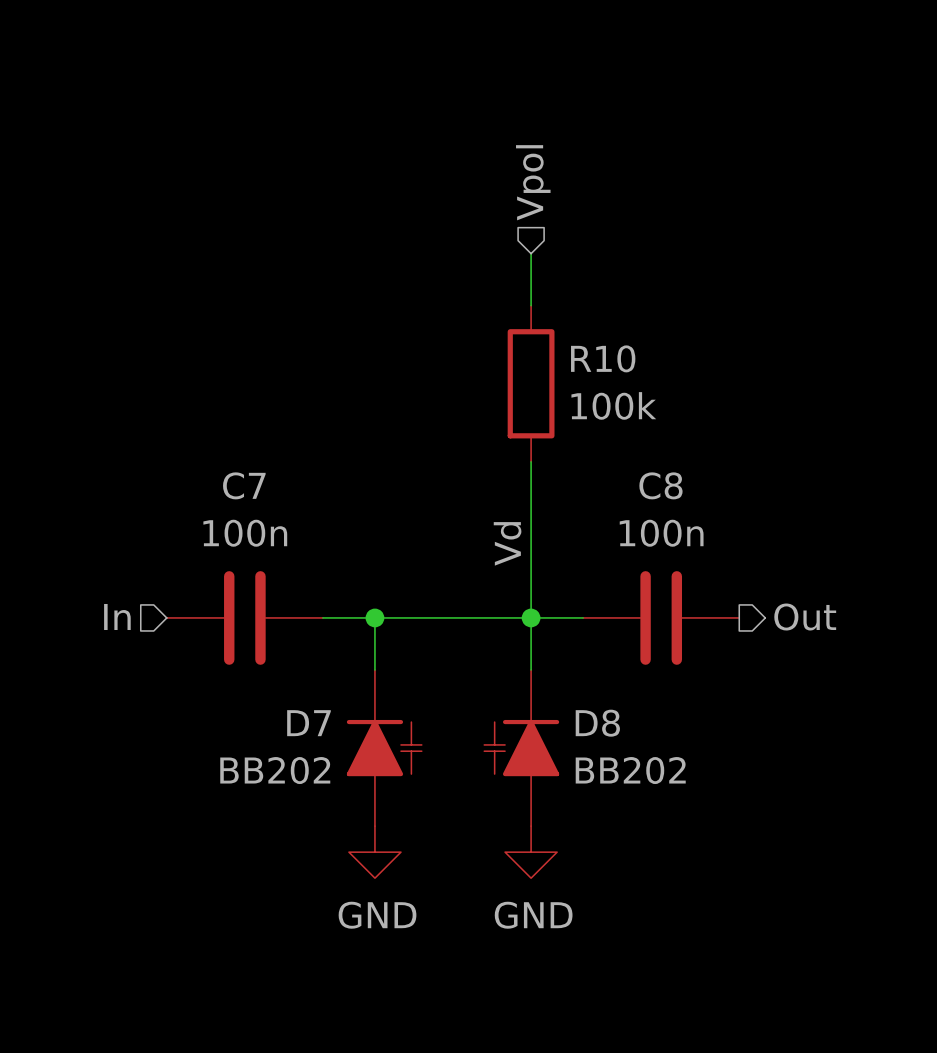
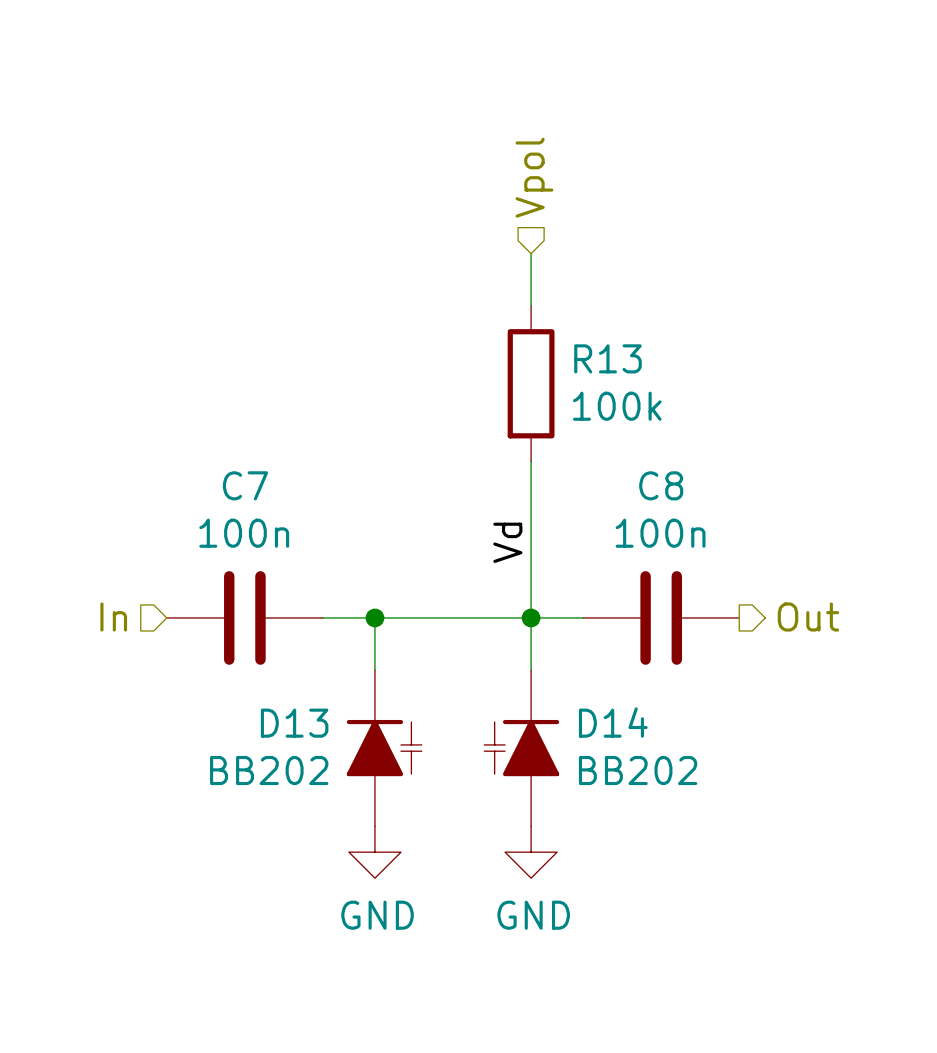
R10 name: R10 (603, 358) -> R13 (607, 358)
D7 name: D7 (308, 723) -> D13 (294, 723)
D8 name: D8 (597, 723) -> D14 (613, 722)

